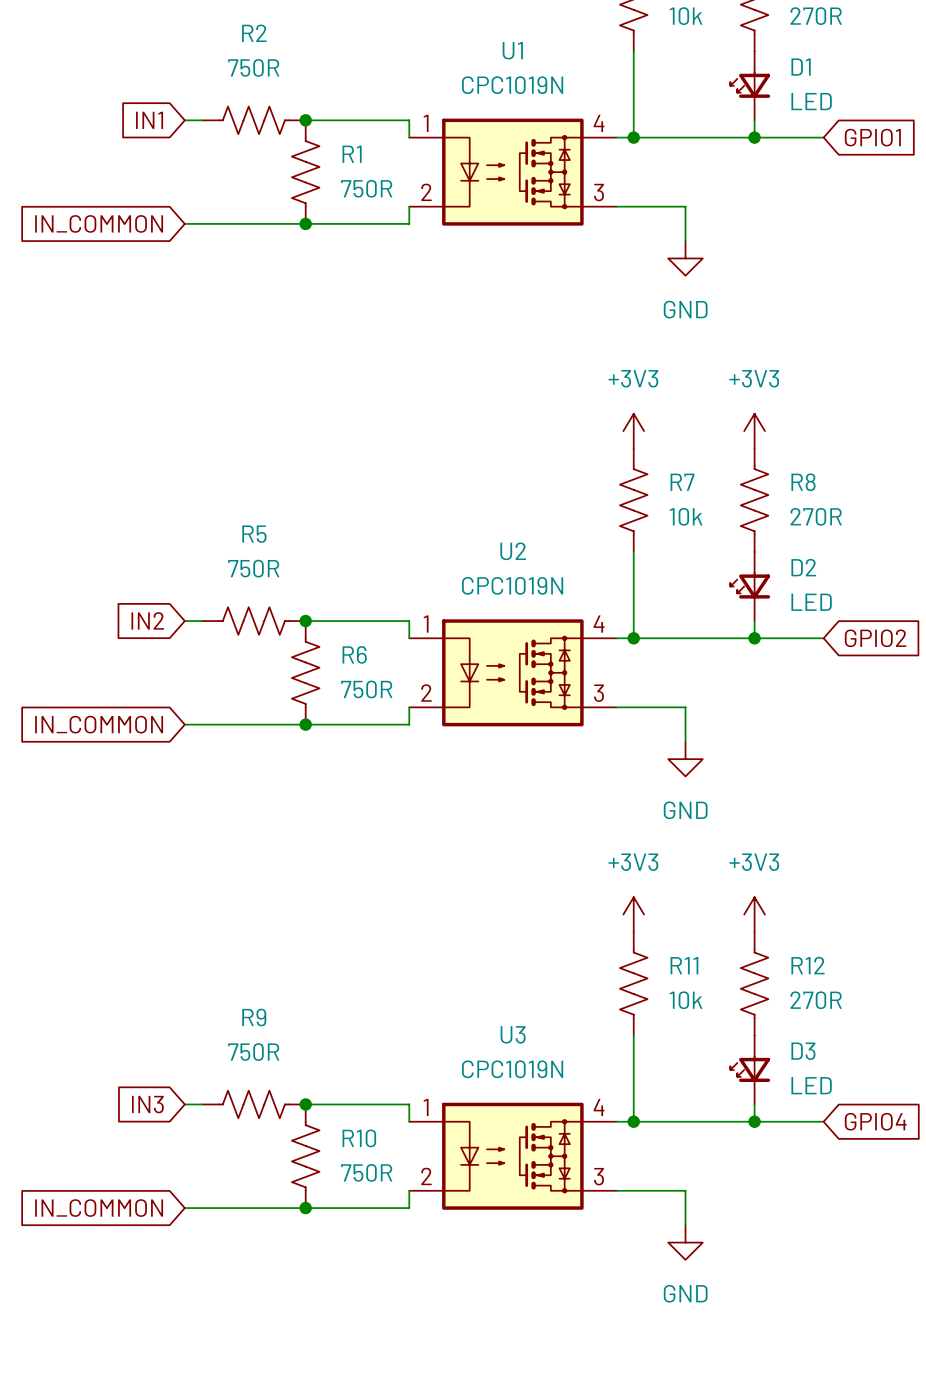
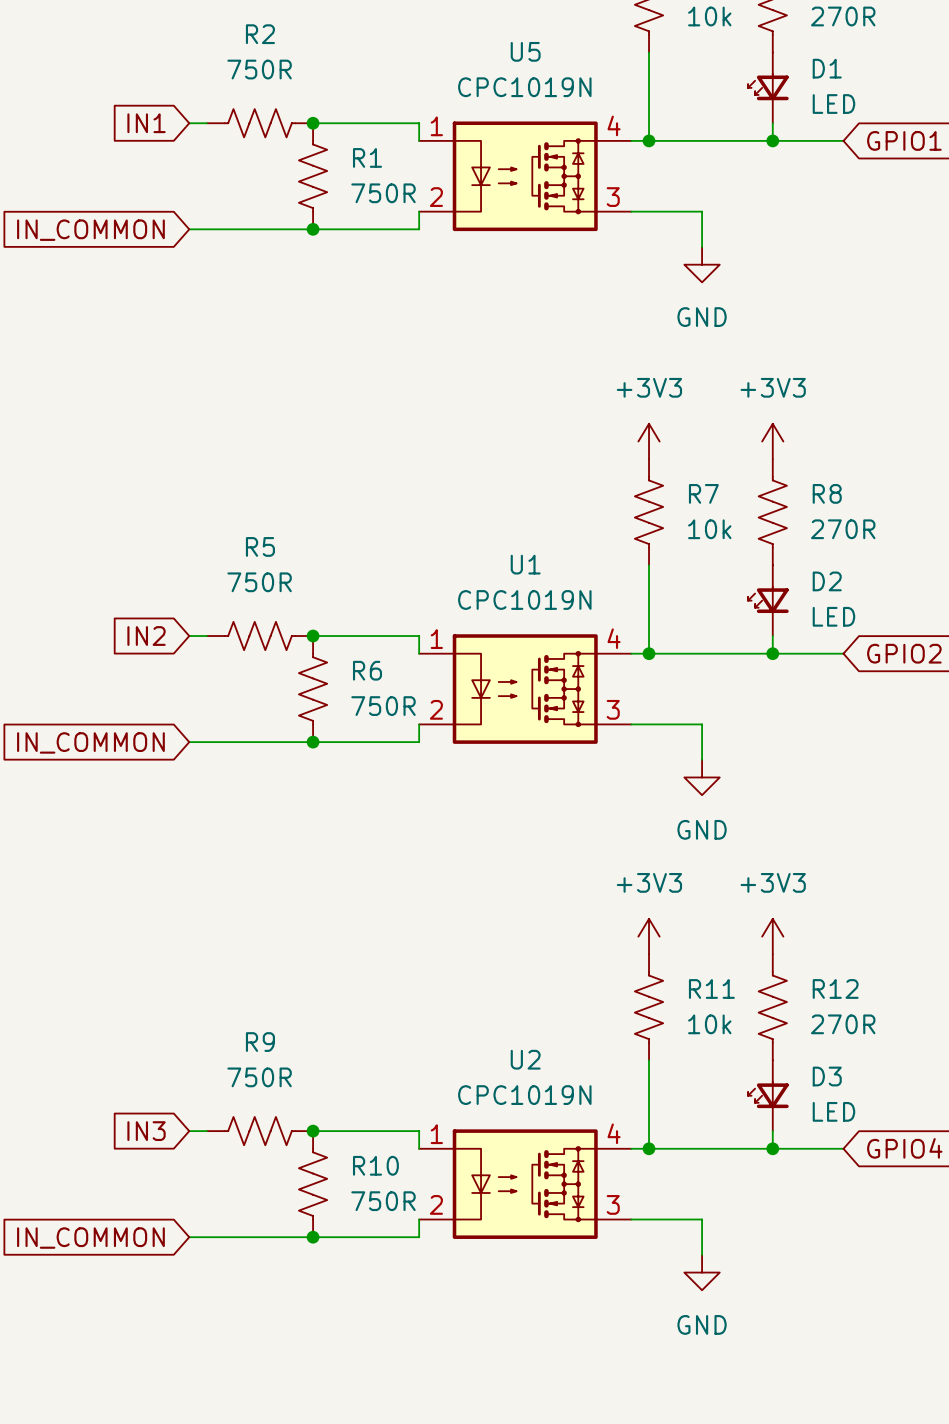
U1 name: U1 (512, 50) -> U5 (525, 51)
U2 name: U2 (513, 551) -> U1 (525, 564)
U3 name: U3 (513, 1034) -> U2 (525, 1059)

